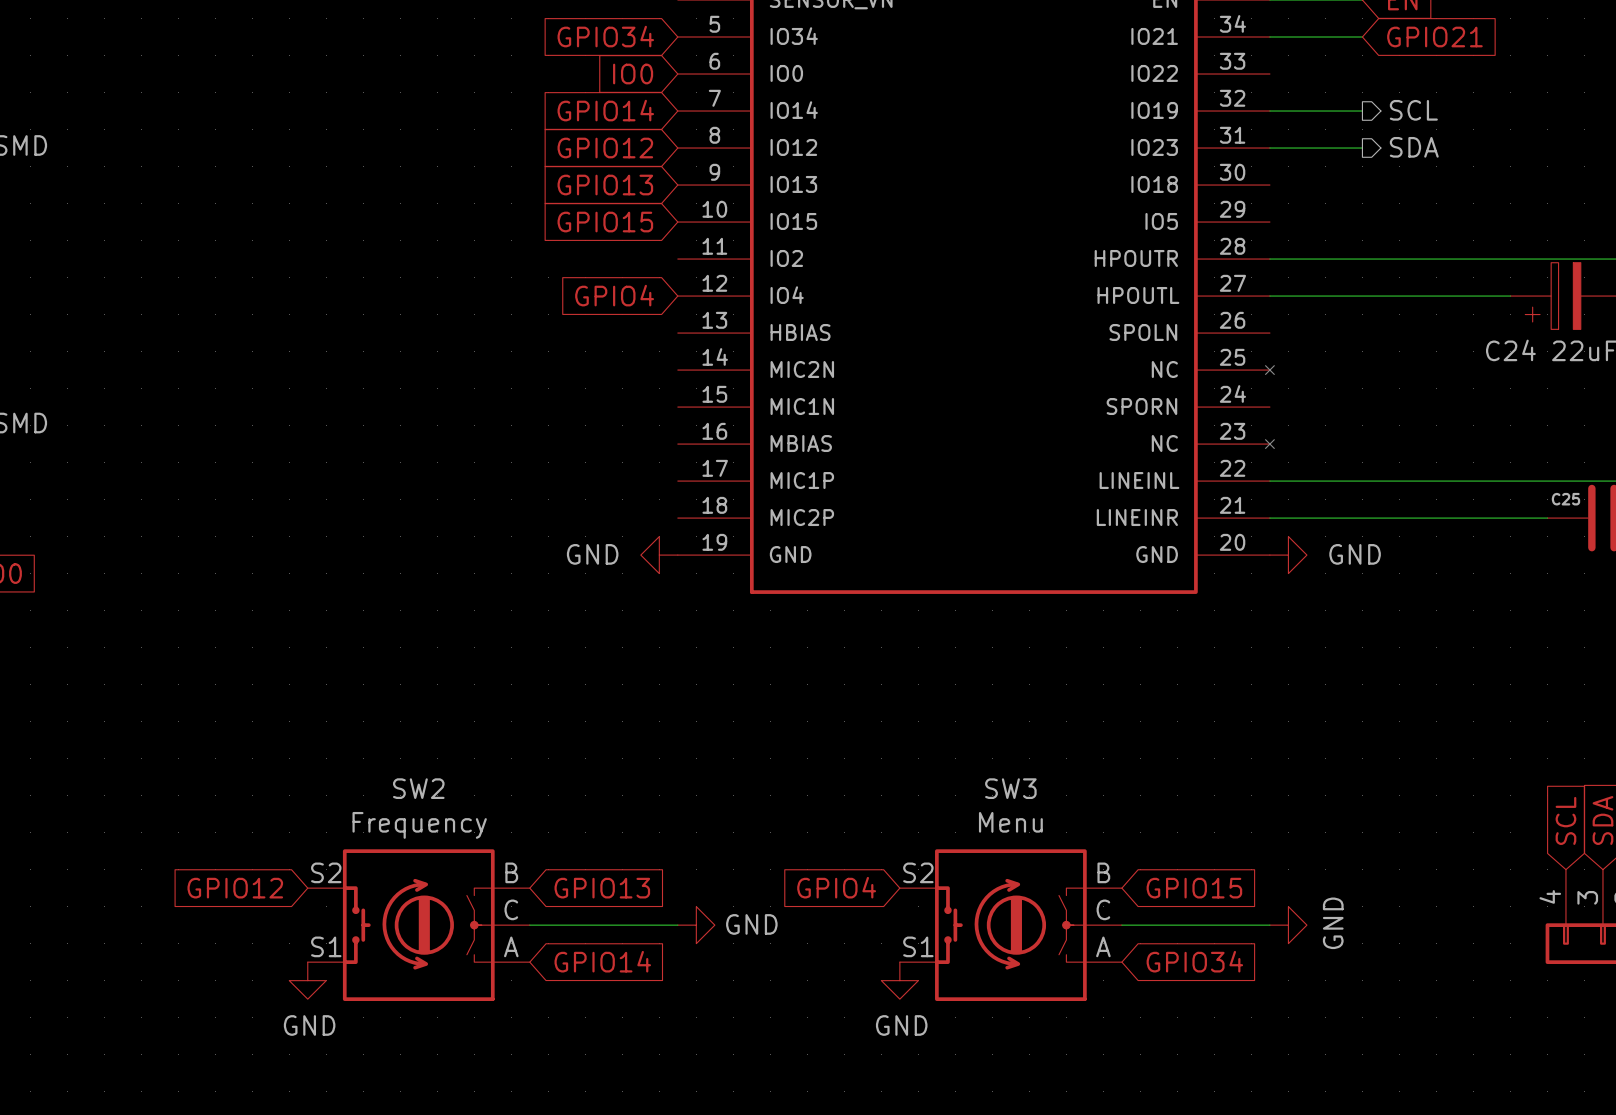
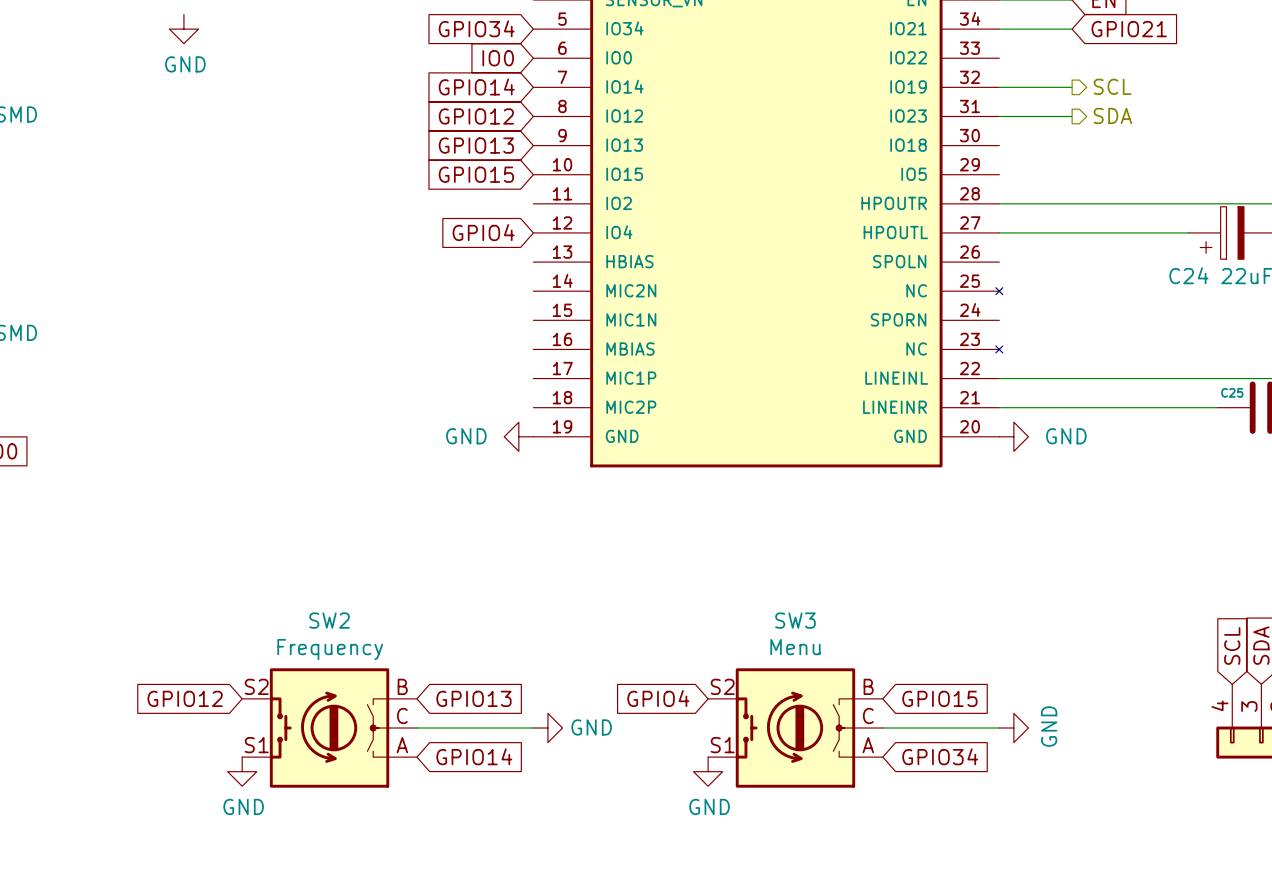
power symbol: none -> GND (183, 29)

